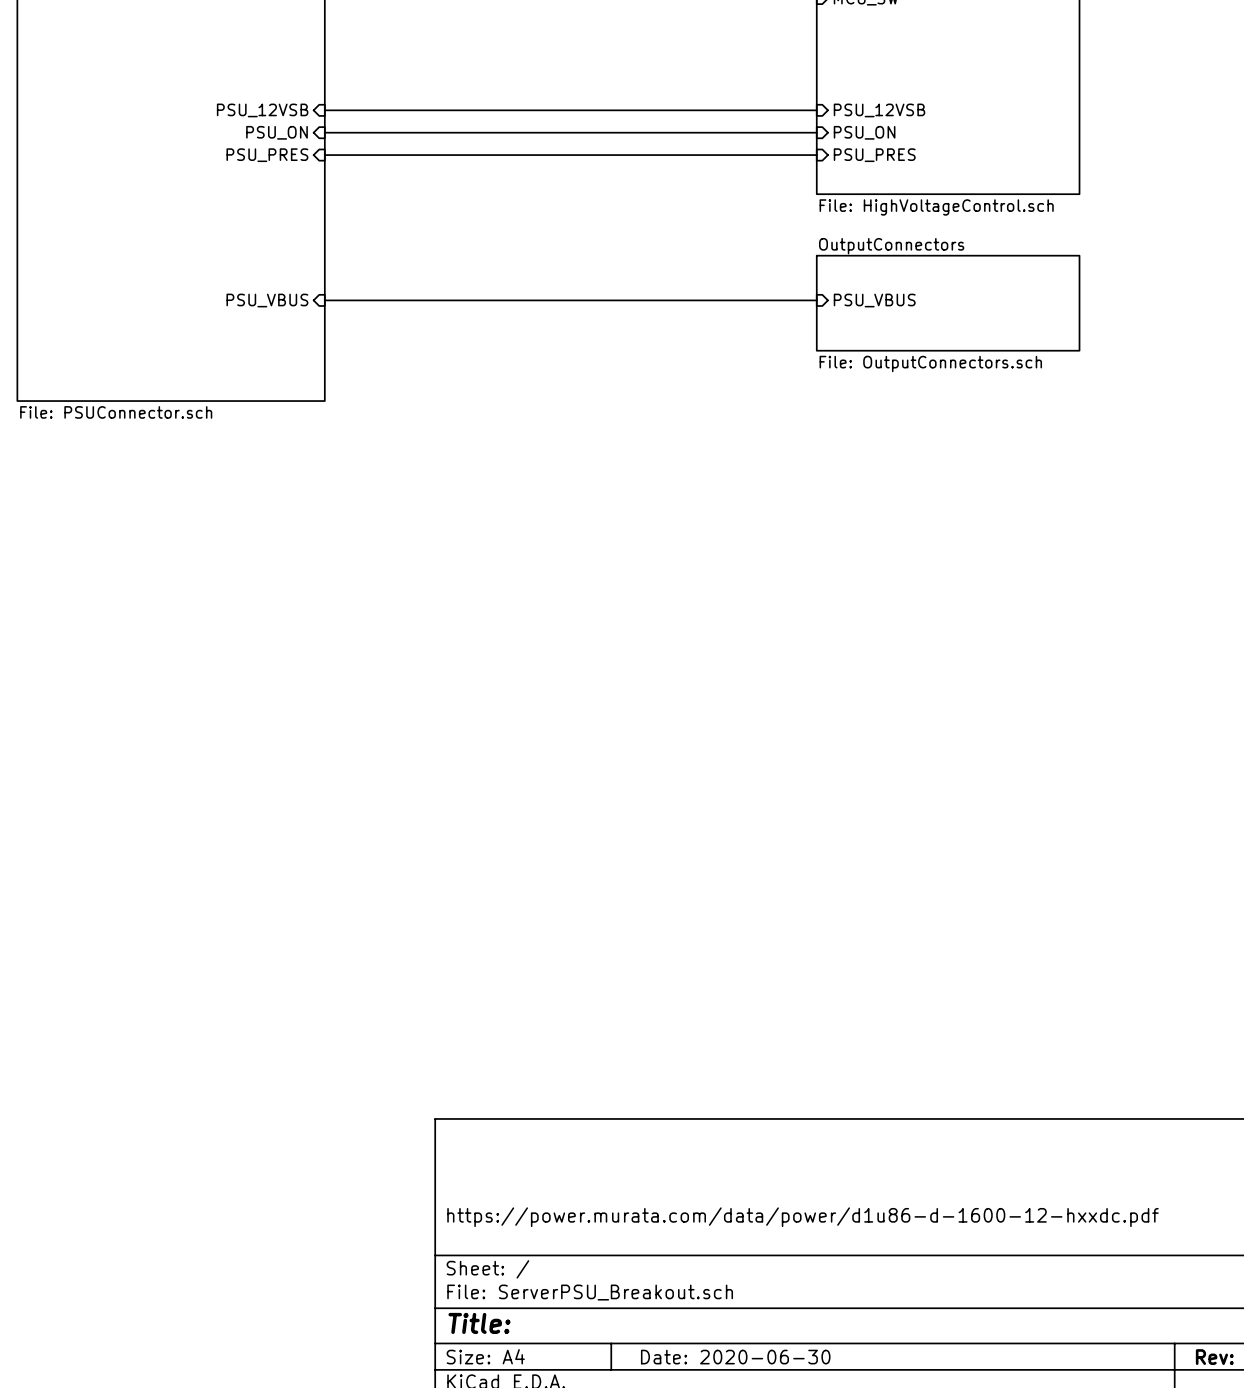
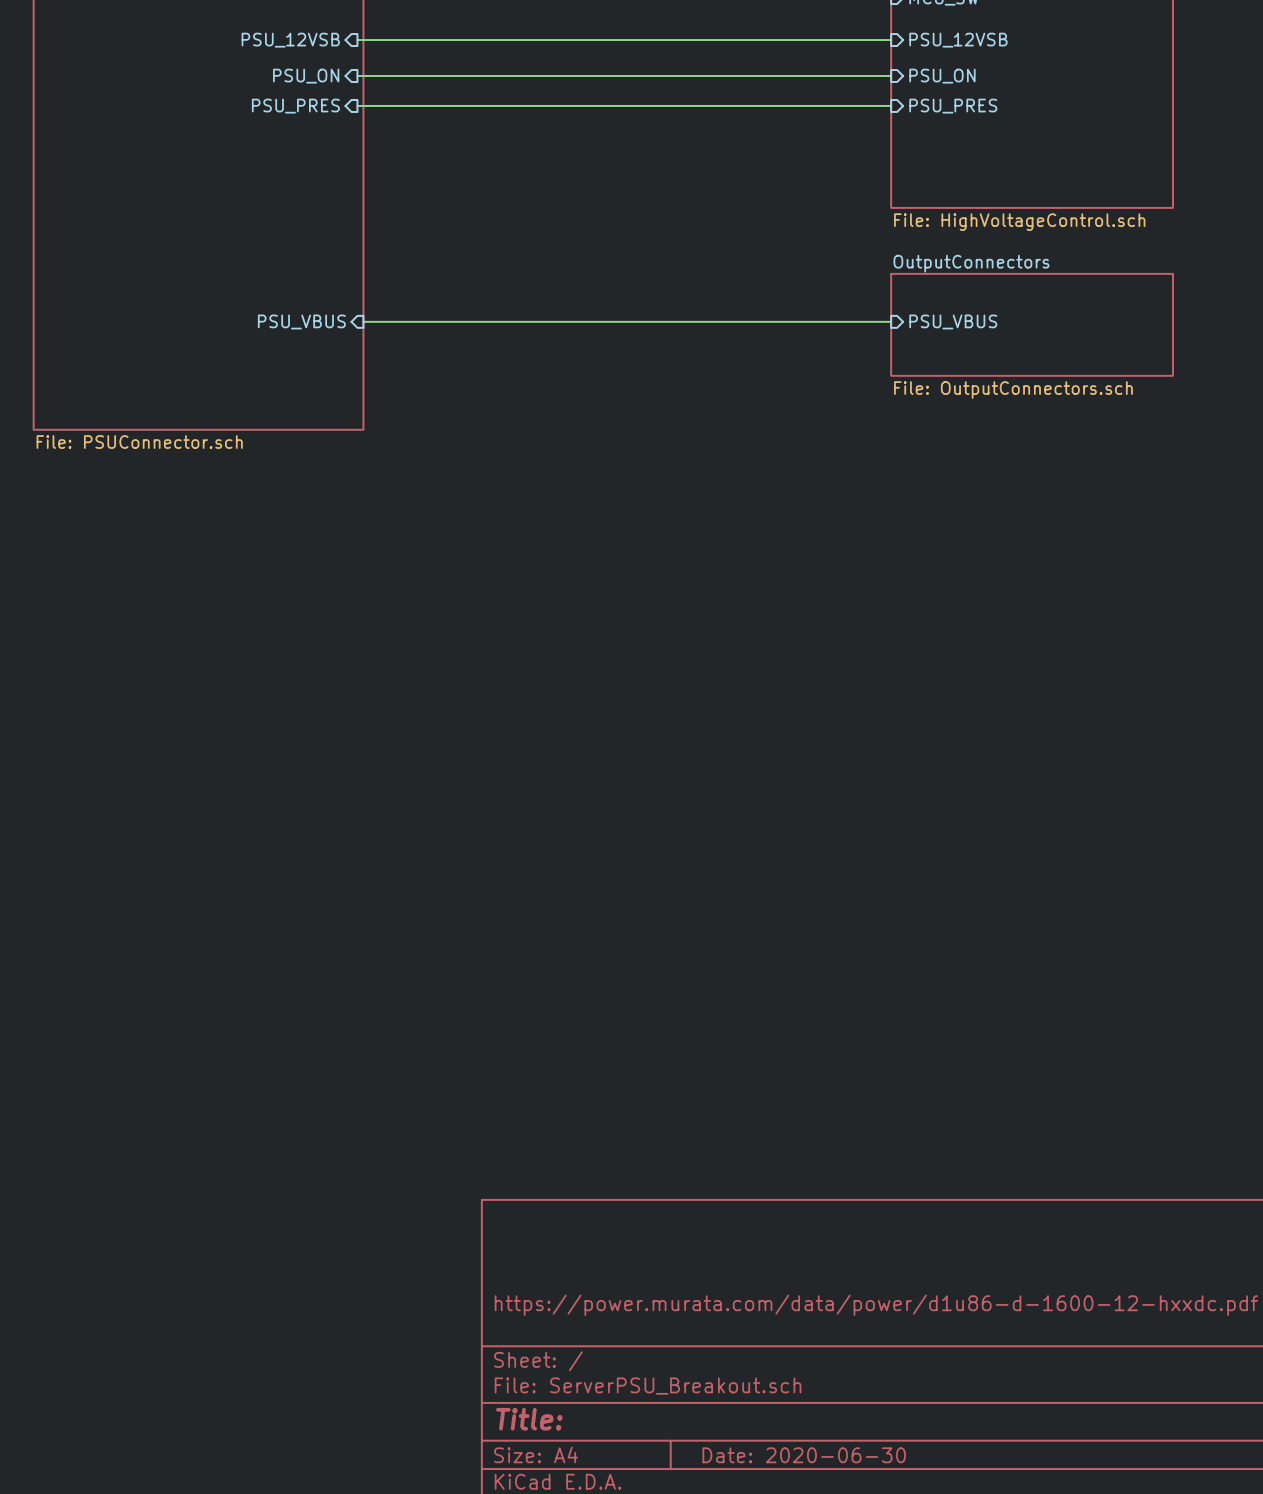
wire: none -> (357, 40) (891, 40)
wire: none -> (357, 76) (891, 76)
wire: none -> (357, 105) (891, 105)
sheet pin position: PSU_12VSB (262, 110) -> PSU_12VSB (290, 40)
wire: (324, 110) (816, 110) -> none
sheet pin position: PSU_12VSB (879, 110) -> PSU_12VSB (958, 40)
sheet pin position: PSU_ON (277, 132) -> PSU_ON (306, 76)
wire: (324, 132) (816, 132) -> none
sheet pin position: PSU_ON (864, 132) -> PSU_ON (942, 76)
sheet pin position: PSU_PRES (267, 155) -> PSU_PRES (295, 106)
wire: (324, 155) (816, 155) -> none
sheet pin position: PSU_PRES (874, 155) -> PSU_PRES (953, 106)

